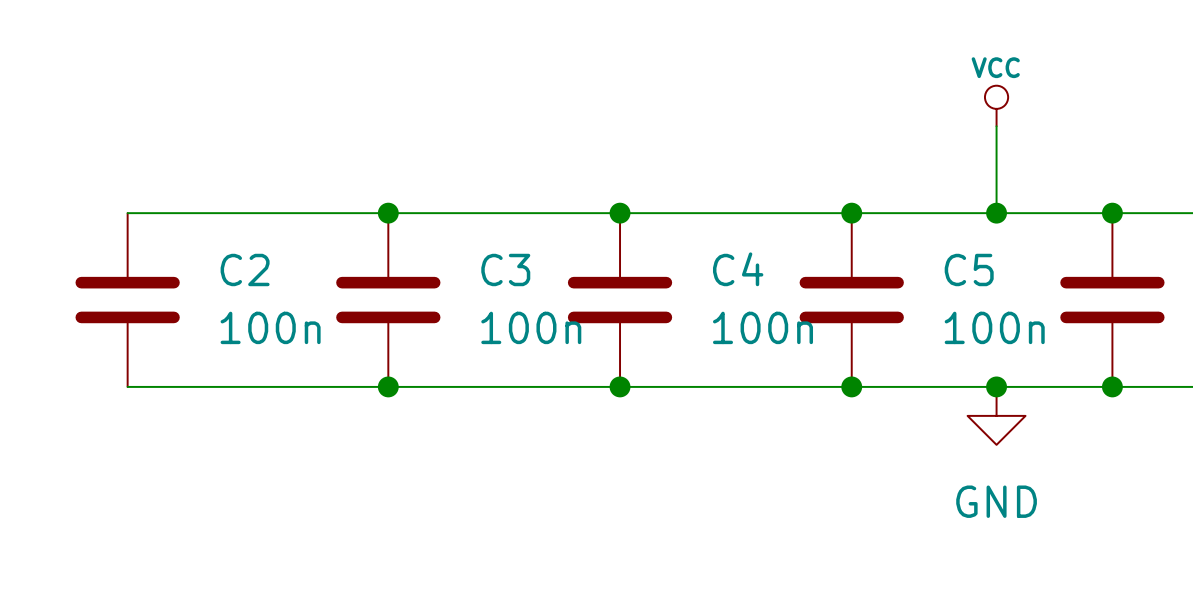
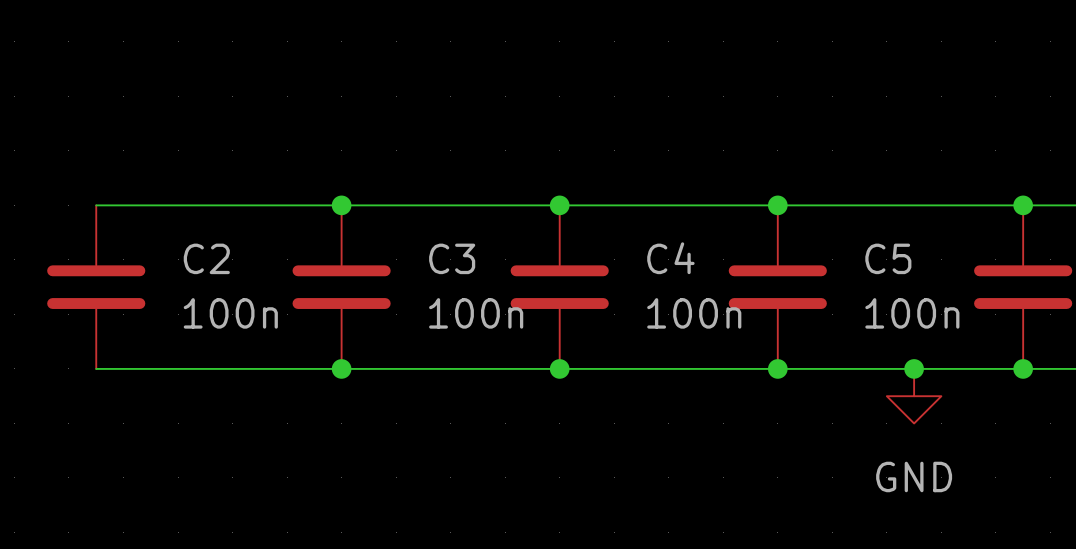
power symbol: VCC (996, 105) -> none
wire: (996, 126) (996, 213) -> none
junction: (996, 213) -> none

